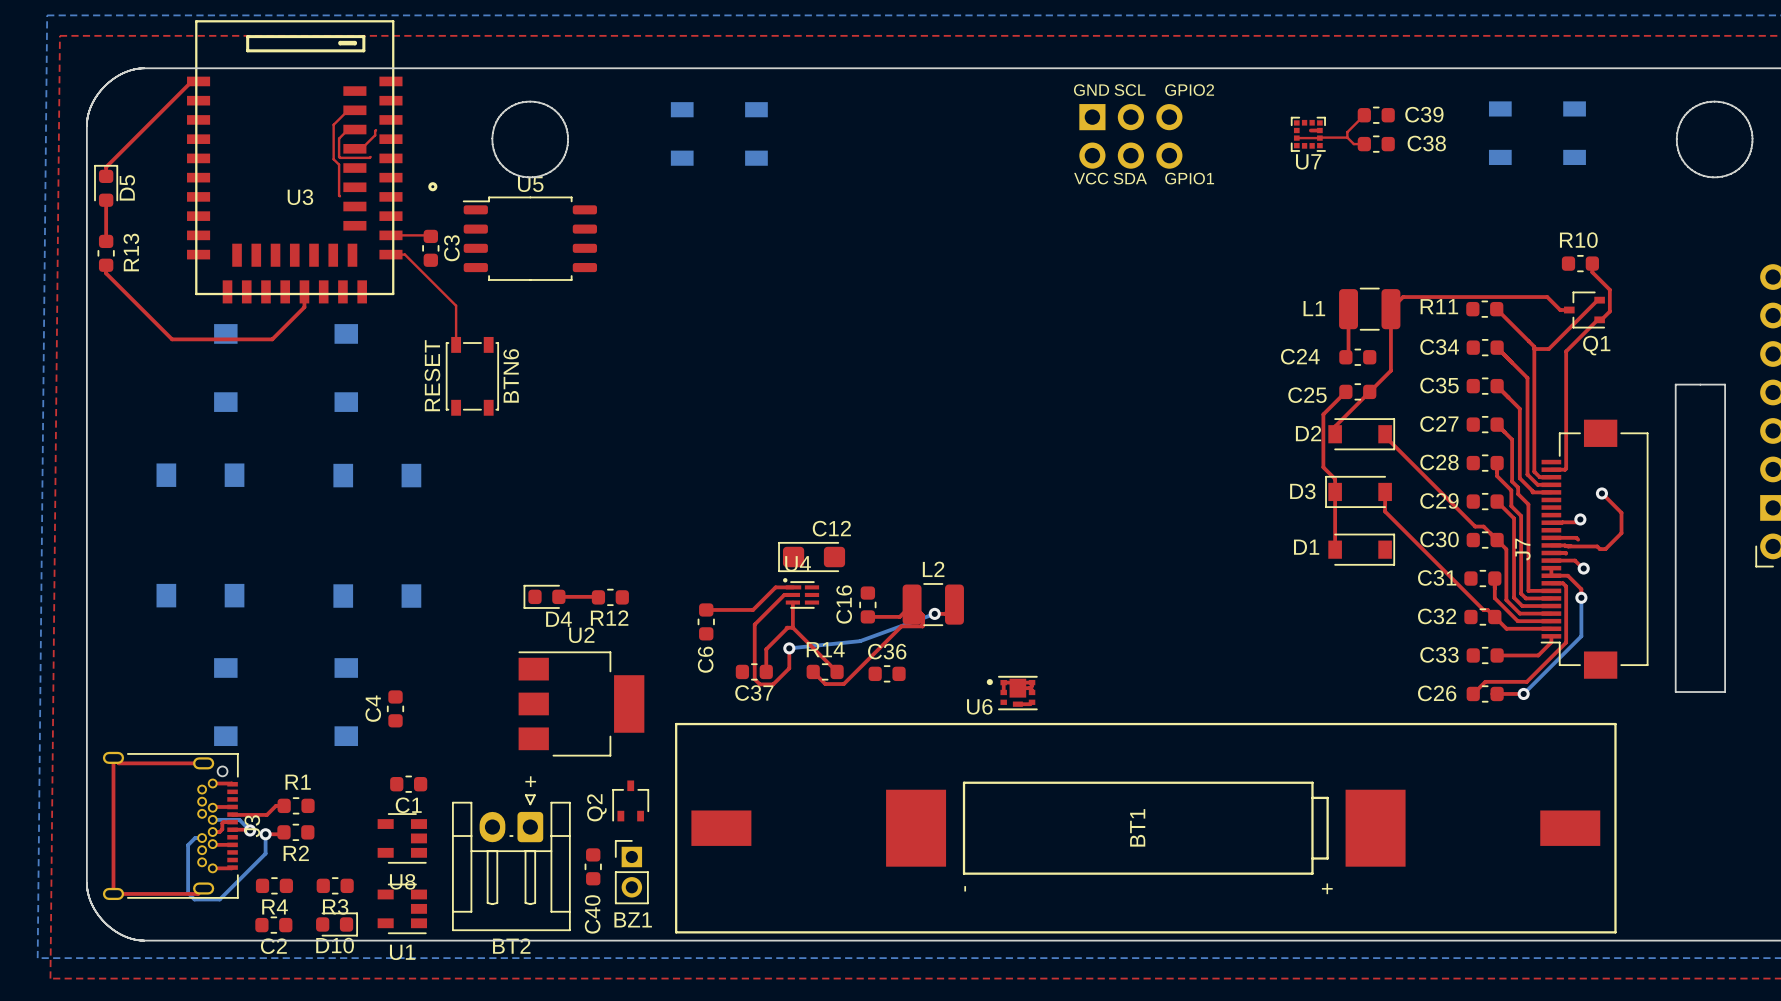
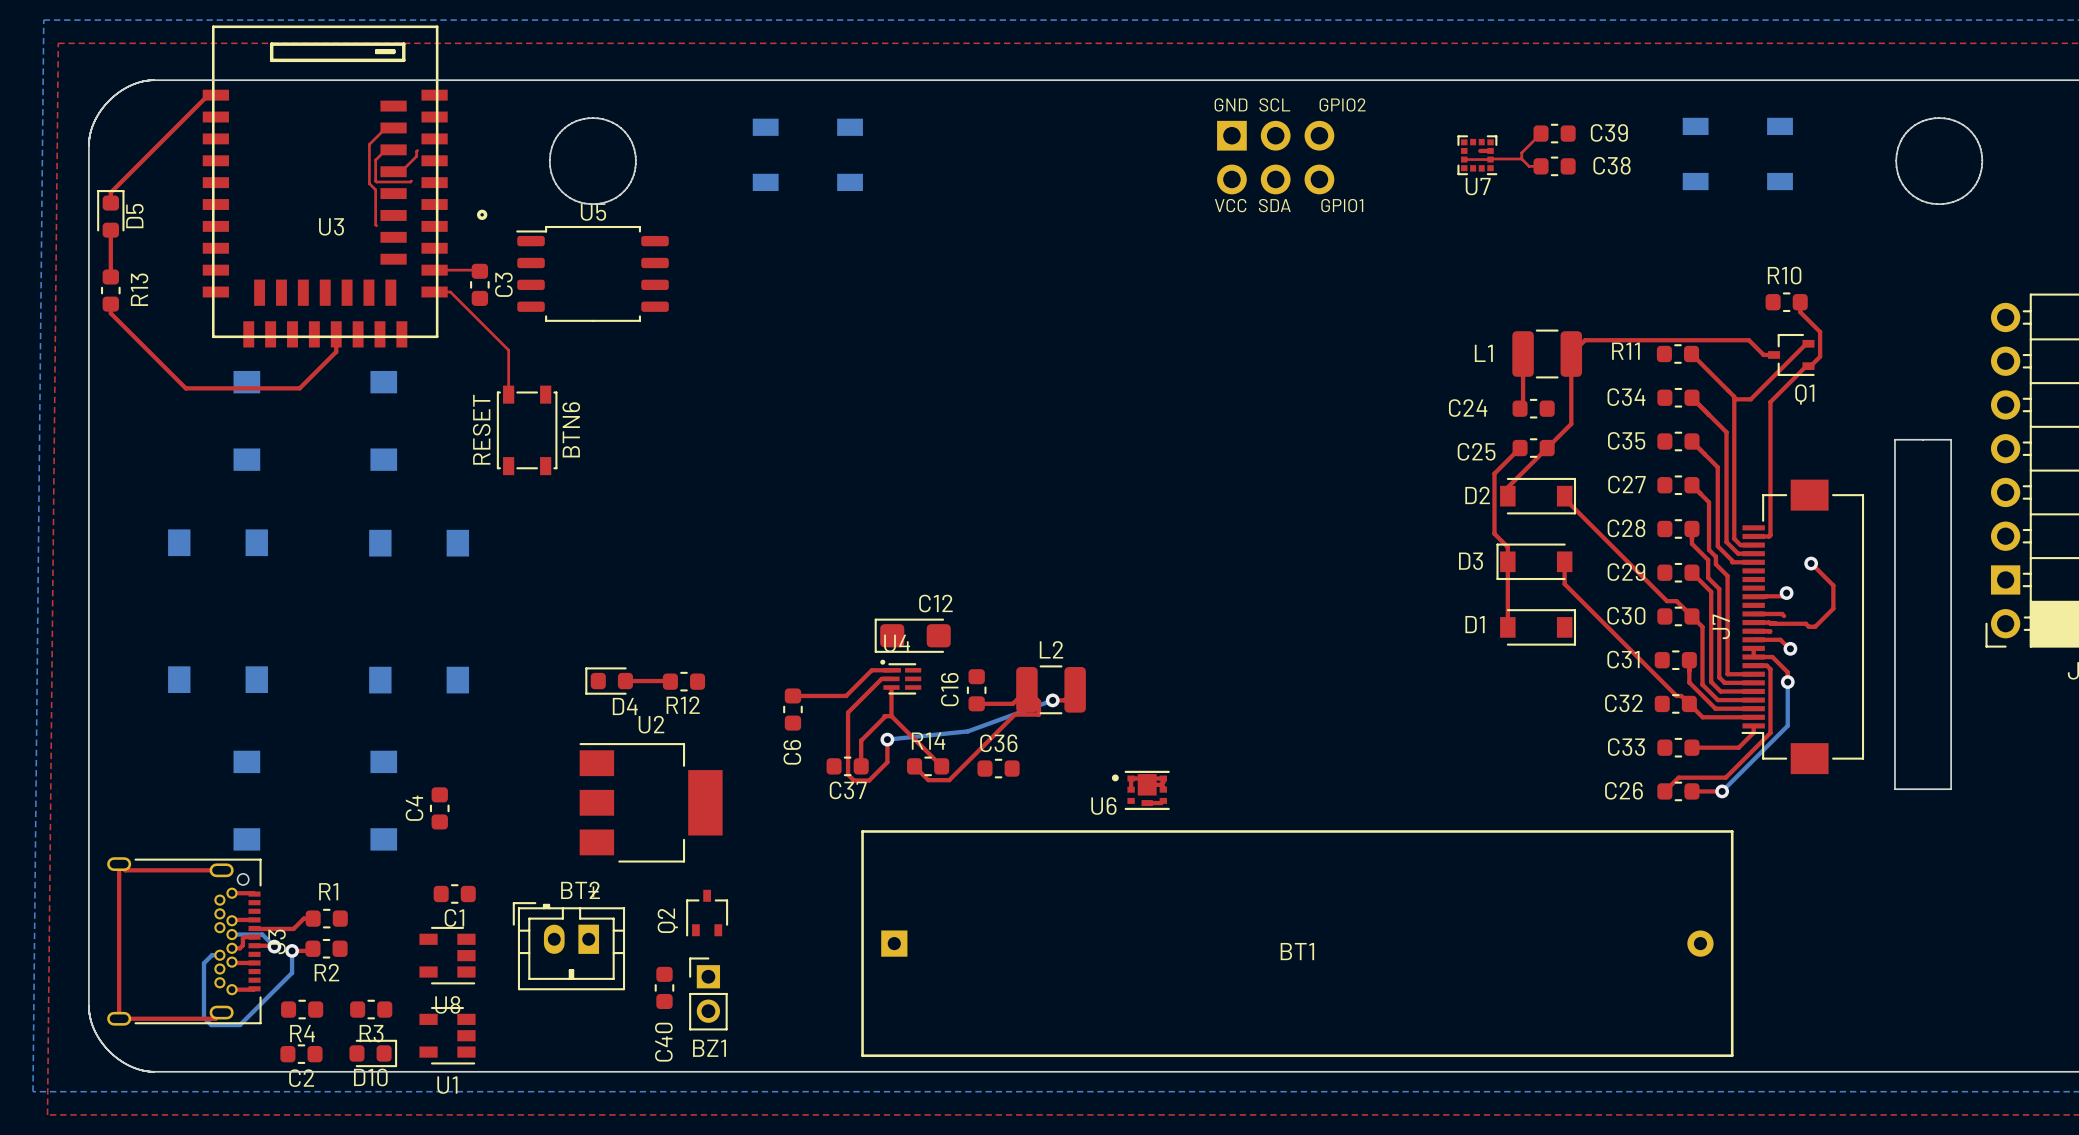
BT1 footprint: [675, 722, 1617, 934] -> [861, 830, 1734, 1057]
BT2 footprint: [452, 794, 571, 932] -> [512, 902, 626, 991]
BT2 name position: BT2 (511, 946) -> BT2 (580, 890)

